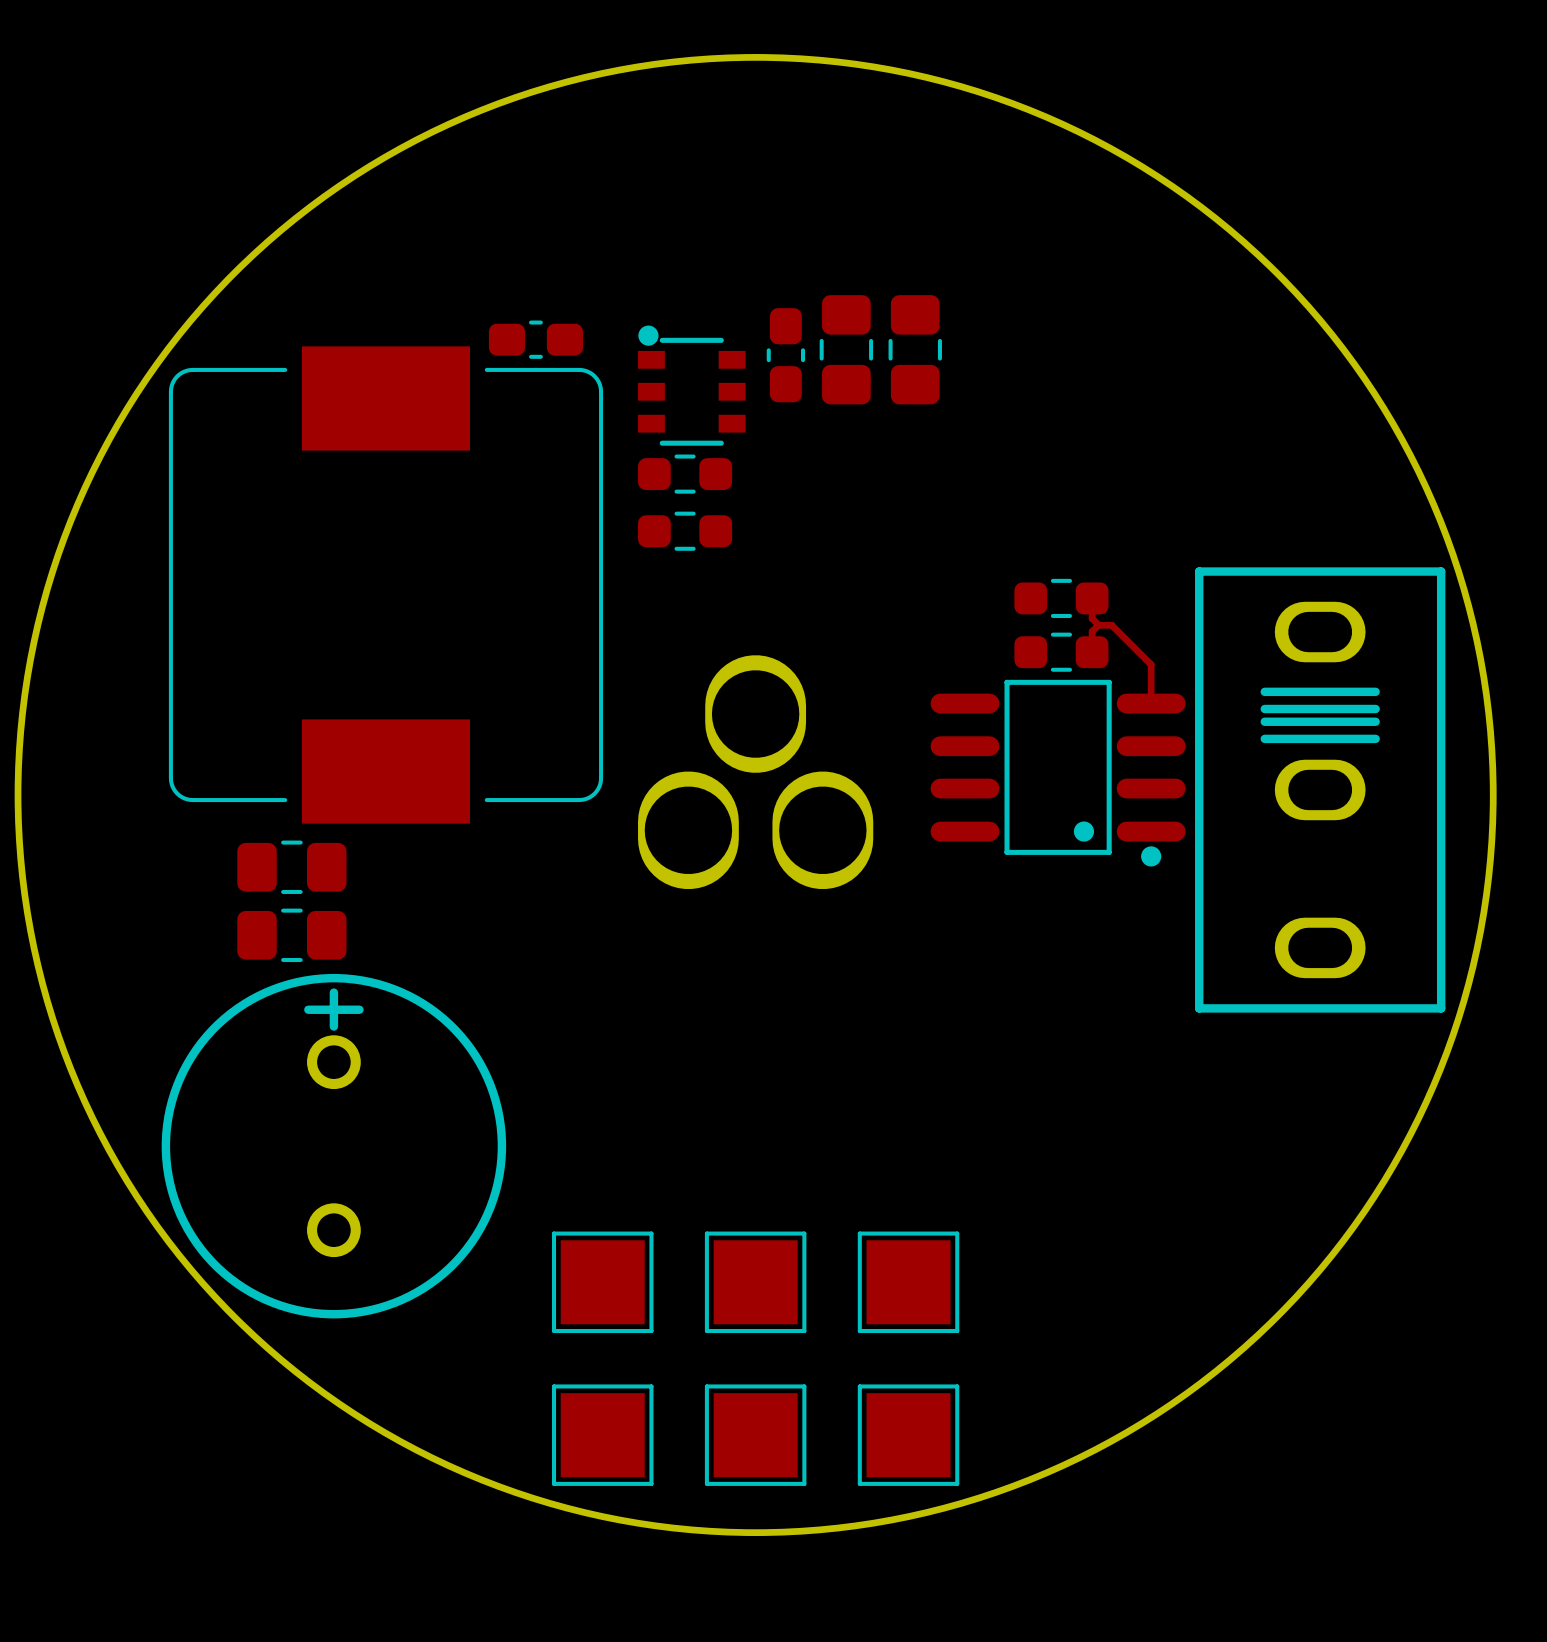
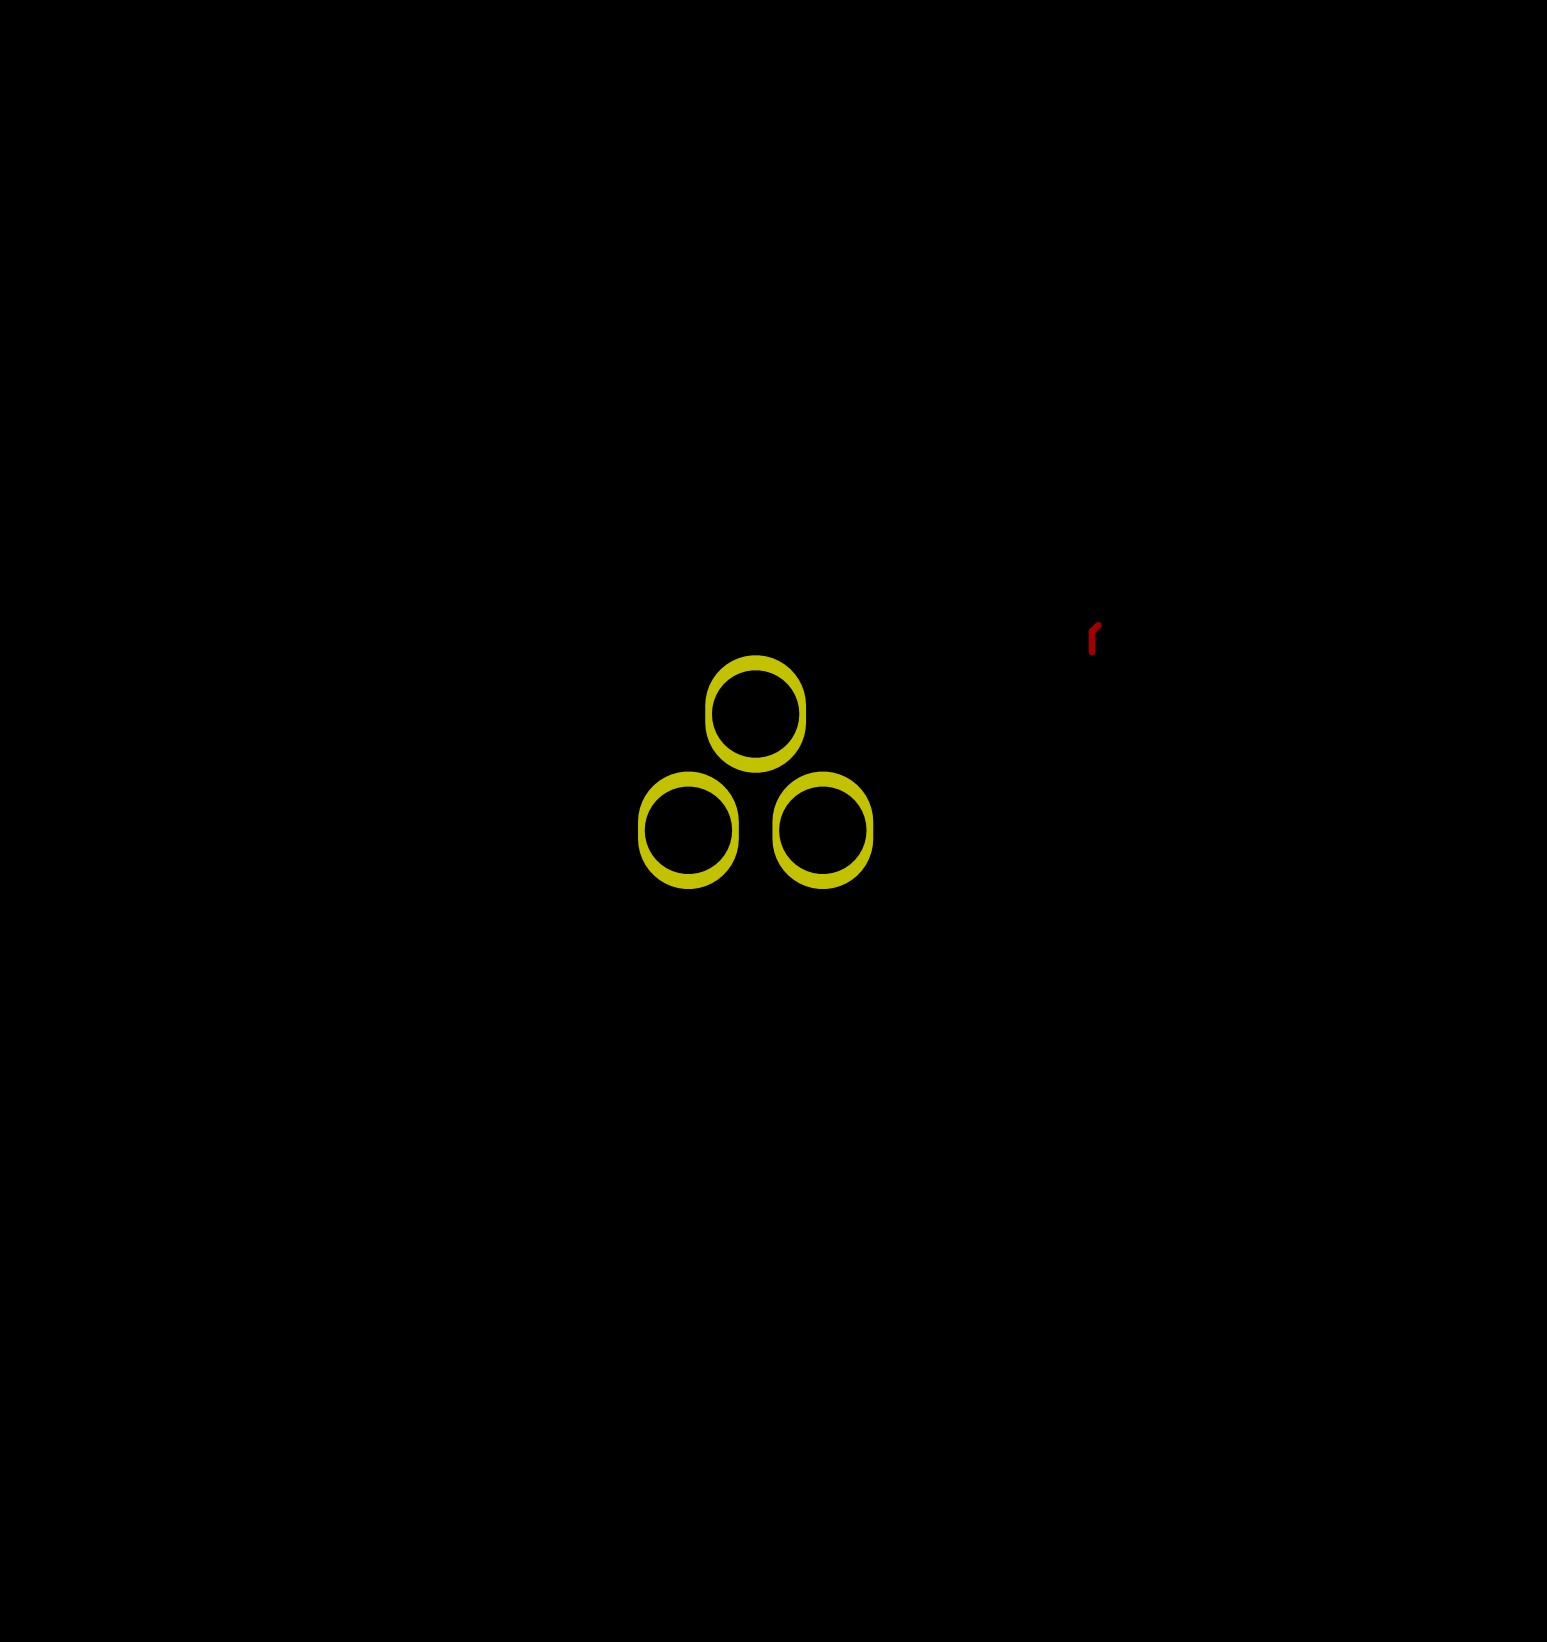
round board edge: [14, 54, 1497, 1536] -> none
part: (535, 339) -> none
part: (846, 349) -> none
part: (915, 349) -> none
part: (785, 355) -> none
part: (691, 385) -> none
part: (685, 474) -> none
part: (685, 531) -> none
part: (385, 584) -> none
part: (1061, 598) -> none
track: (1092, 598) (1092, 618) (1098, 625) (1111, 625) (1151, 664) (1151, 703) -> none
part: (1061, 652) -> none
part: (1058, 773) -> none
part: (1320, 789) -> none
part: (291, 867) -> none
part: (291, 935) -> none
part: (333, 1146) -> none
part: (602, 1282) -> none
part: (755, 1282) -> none
part: (908, 1282) -> none
part: (602, 1435) -> none
part: (755, 1435) -> none
part: (908, 1435) -> none

